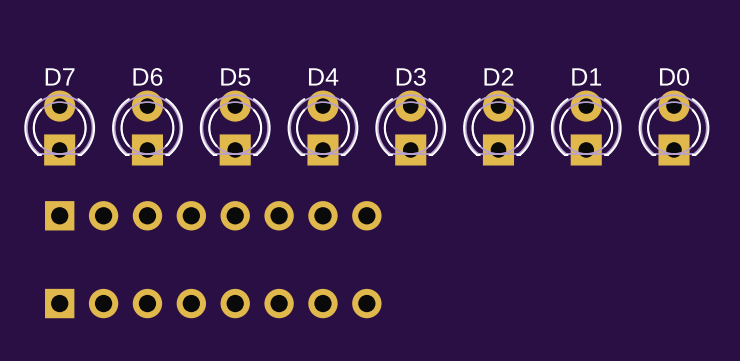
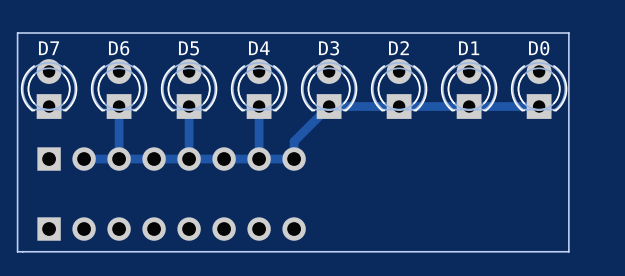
board edge: none -> (17, 33) (568, 33) (568, 251) (17, 251) (17, 33)
track: none -> (119, 106) (119, 159)
track: none -> (189, 106) (189, 159)
track: none -> (259, 106) (259, 159)
track: none -> (539, 106) (329, 106) (294, 141) (294, 159) (84, 159)

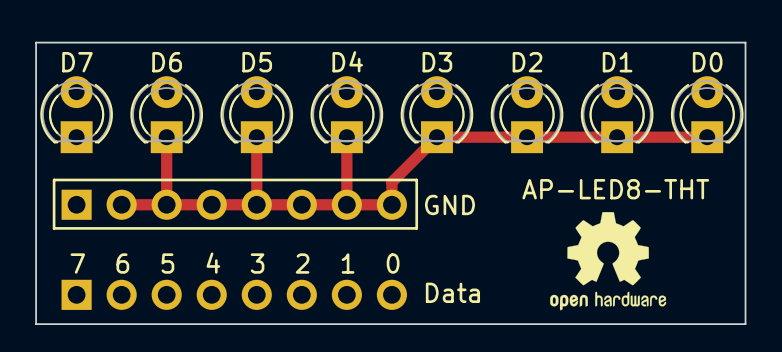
line: none -> (54, 179) (416, 179) (416, 228) (54, 228) (54, 179)
text: none -> AP-LED8-THT (615, 189)
text: none -> GND (449, 204)
drawing: none -> [550, 212, 667, 311]
text: none -> 7 (77, 263)
text: none -> 6 (122, 263)
text: none -> 5 (167, 263)
text: none -> 4 (213, 263)
text: none -> 3 (257, 263)
text: none -> 2 (302, 263)
text: none -> 1 (348, 263)
text: none -> 0 (393, 263)
text: none -> Data (452, 292)

